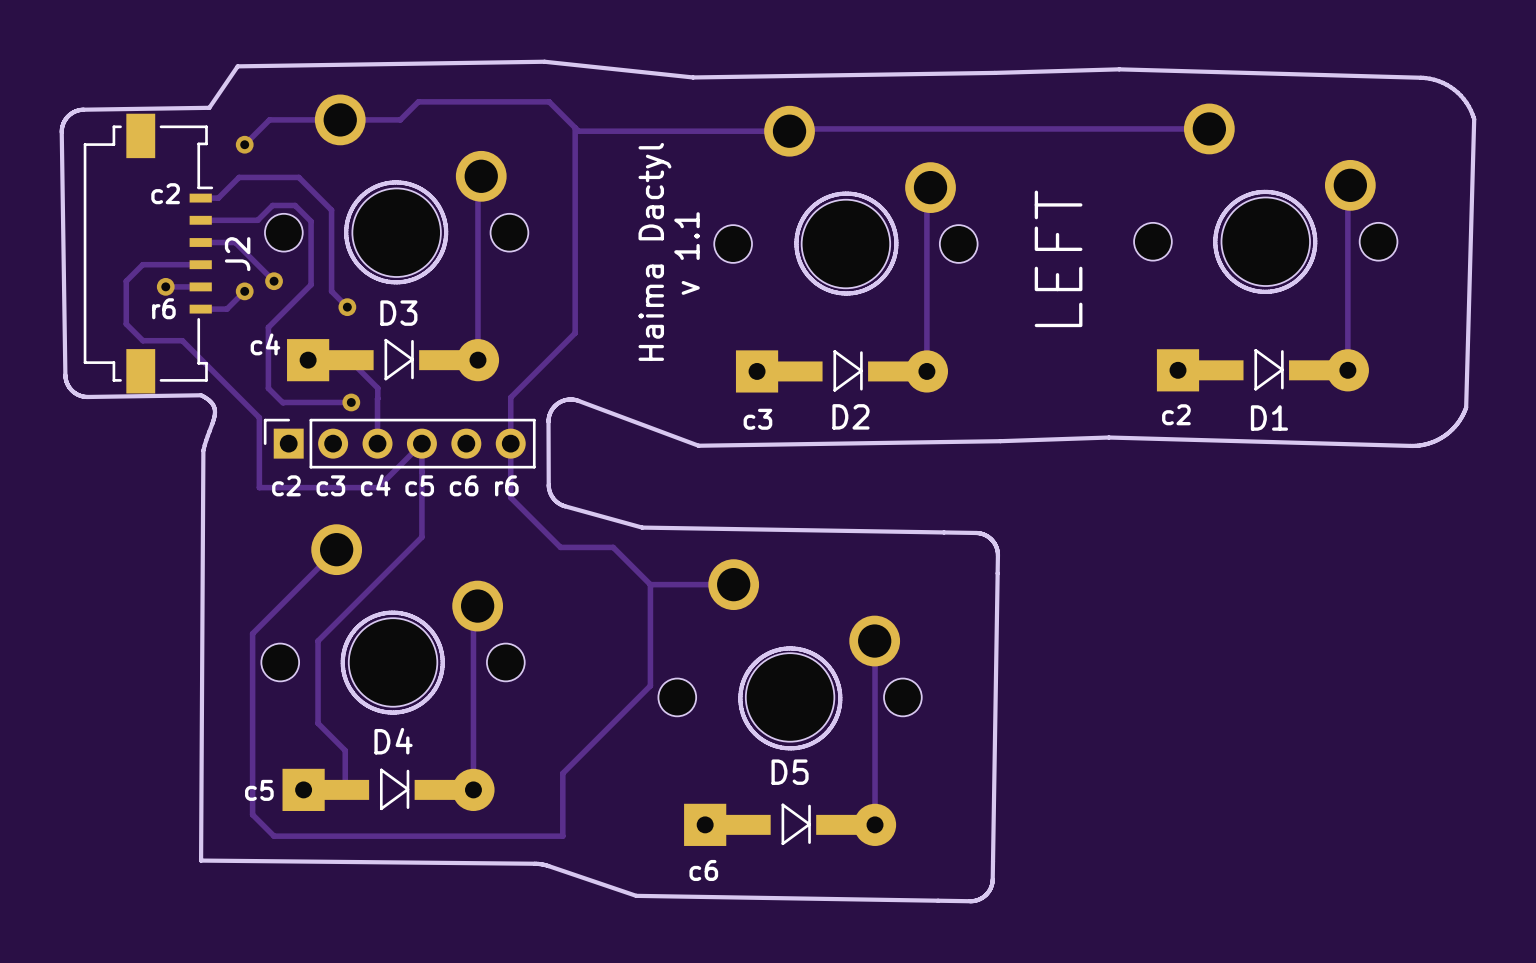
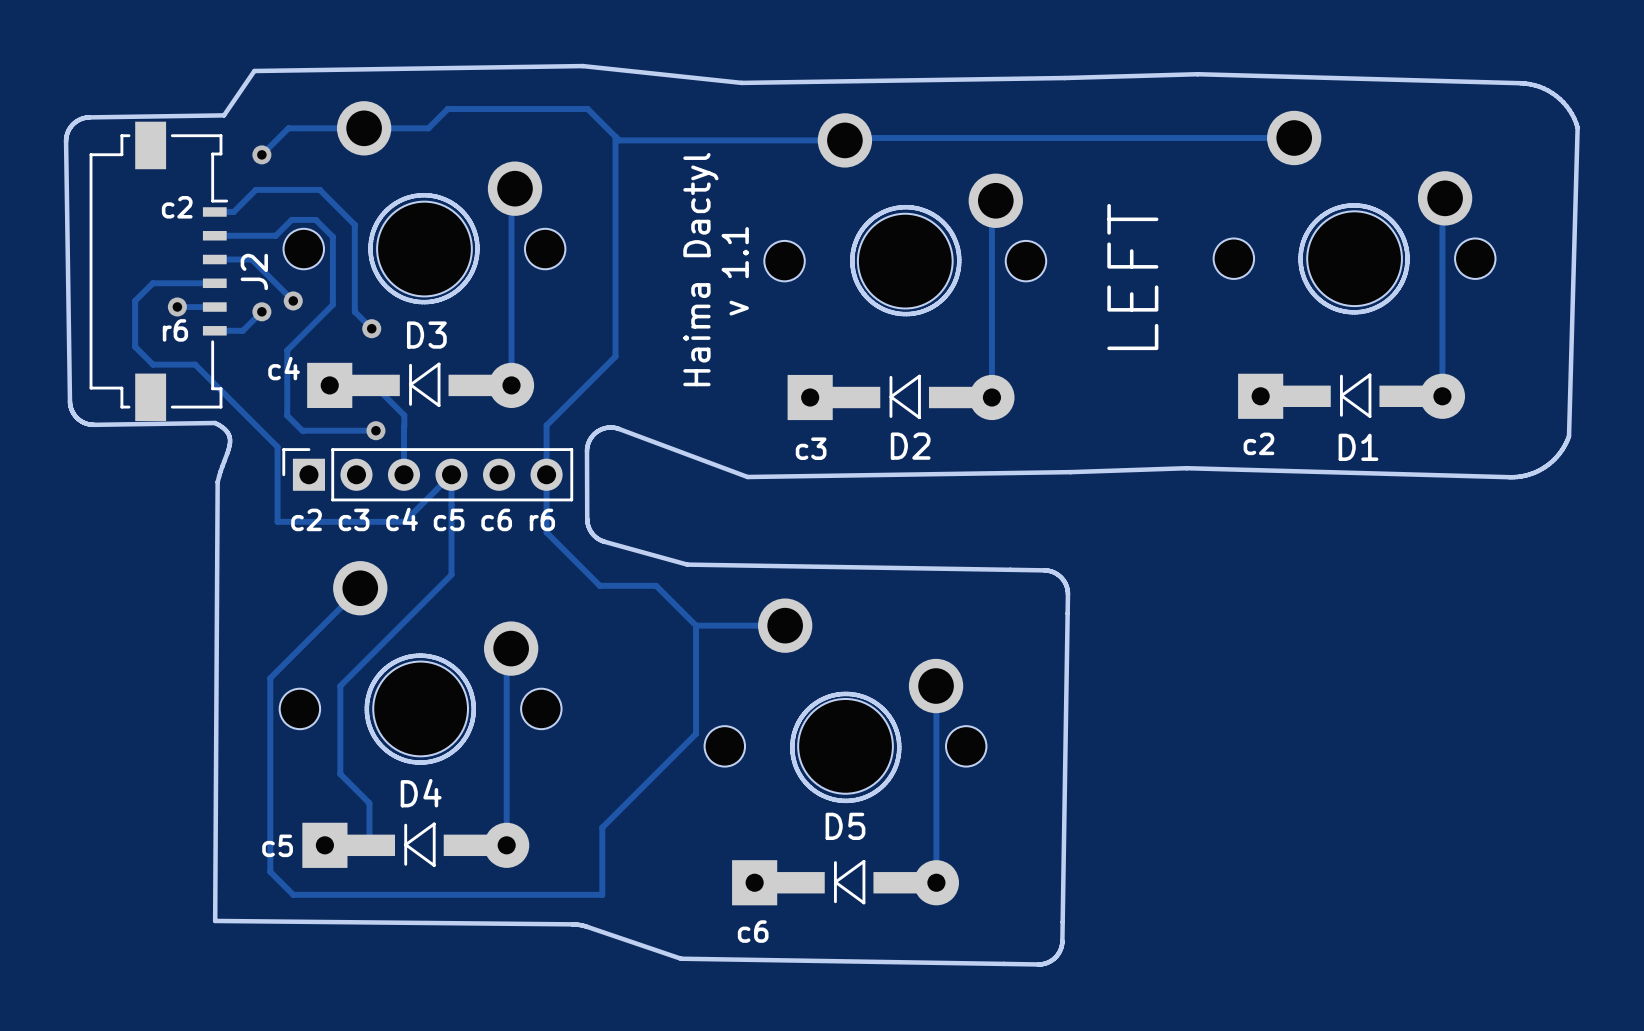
D3 footprint: [287, 338, 500, 382] -> [307, 362, 535, 408]
D1 footprint: [1156, 349, 1369, 392] -> [1238, 373, 1466, 419]
D2 footprint: [735, 350, 949, 393] -> [787, 374, 1015, 421]
D4 footprint: [282, 768, 495, 812] -> [302, 822, 530, 868]
D5 footprint: [684, 803, 897, 846] -> [732, 859, 959, 906]

